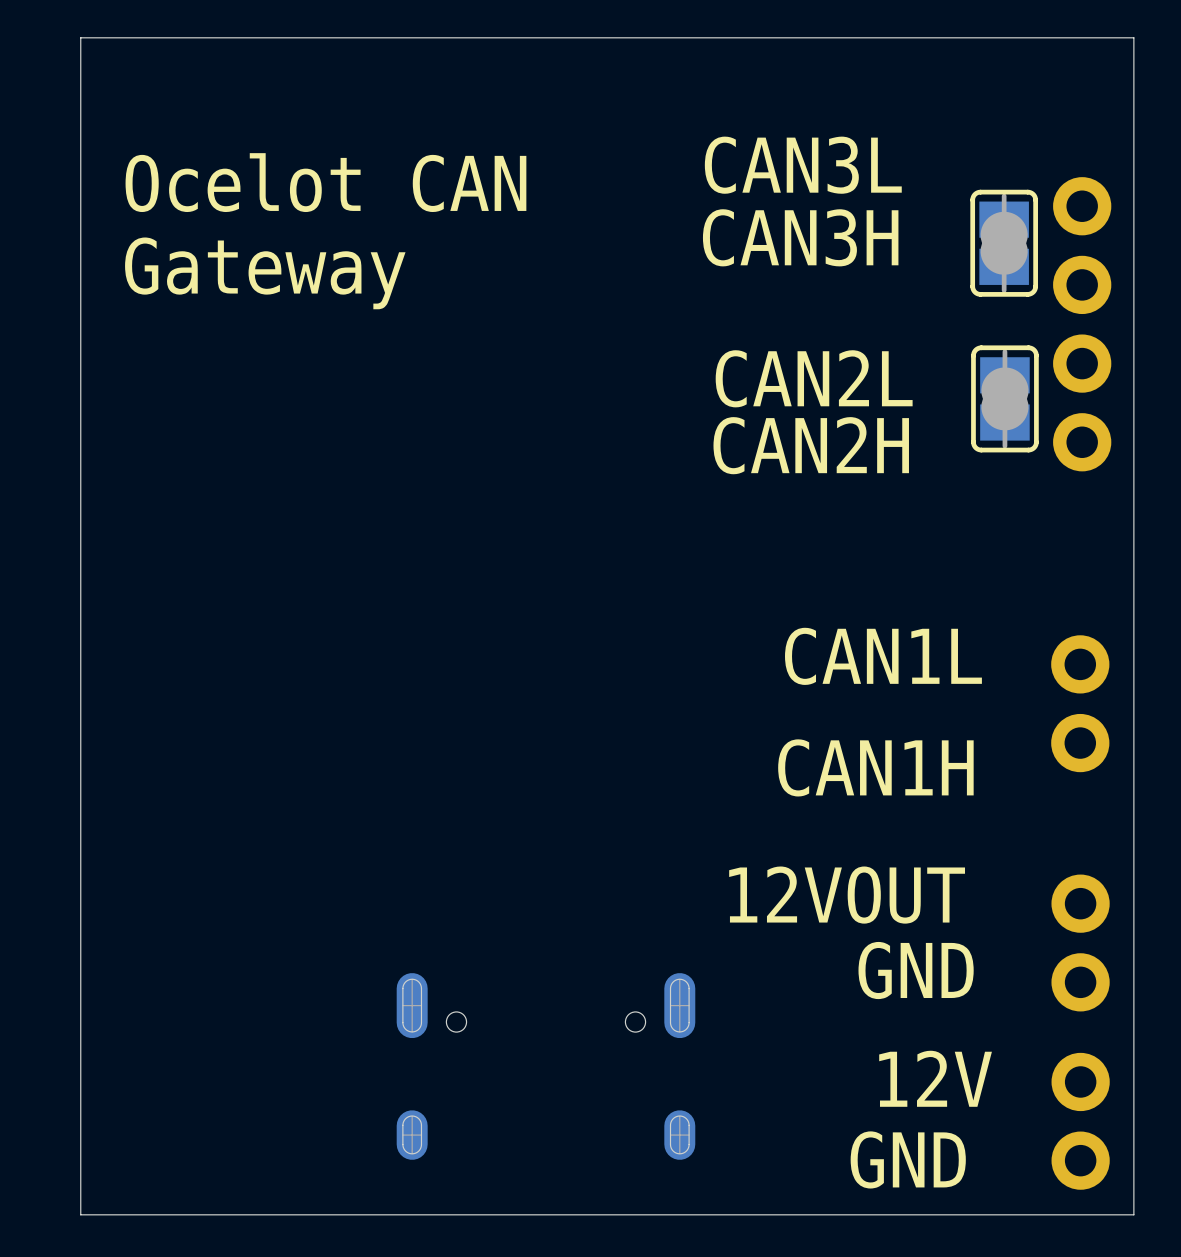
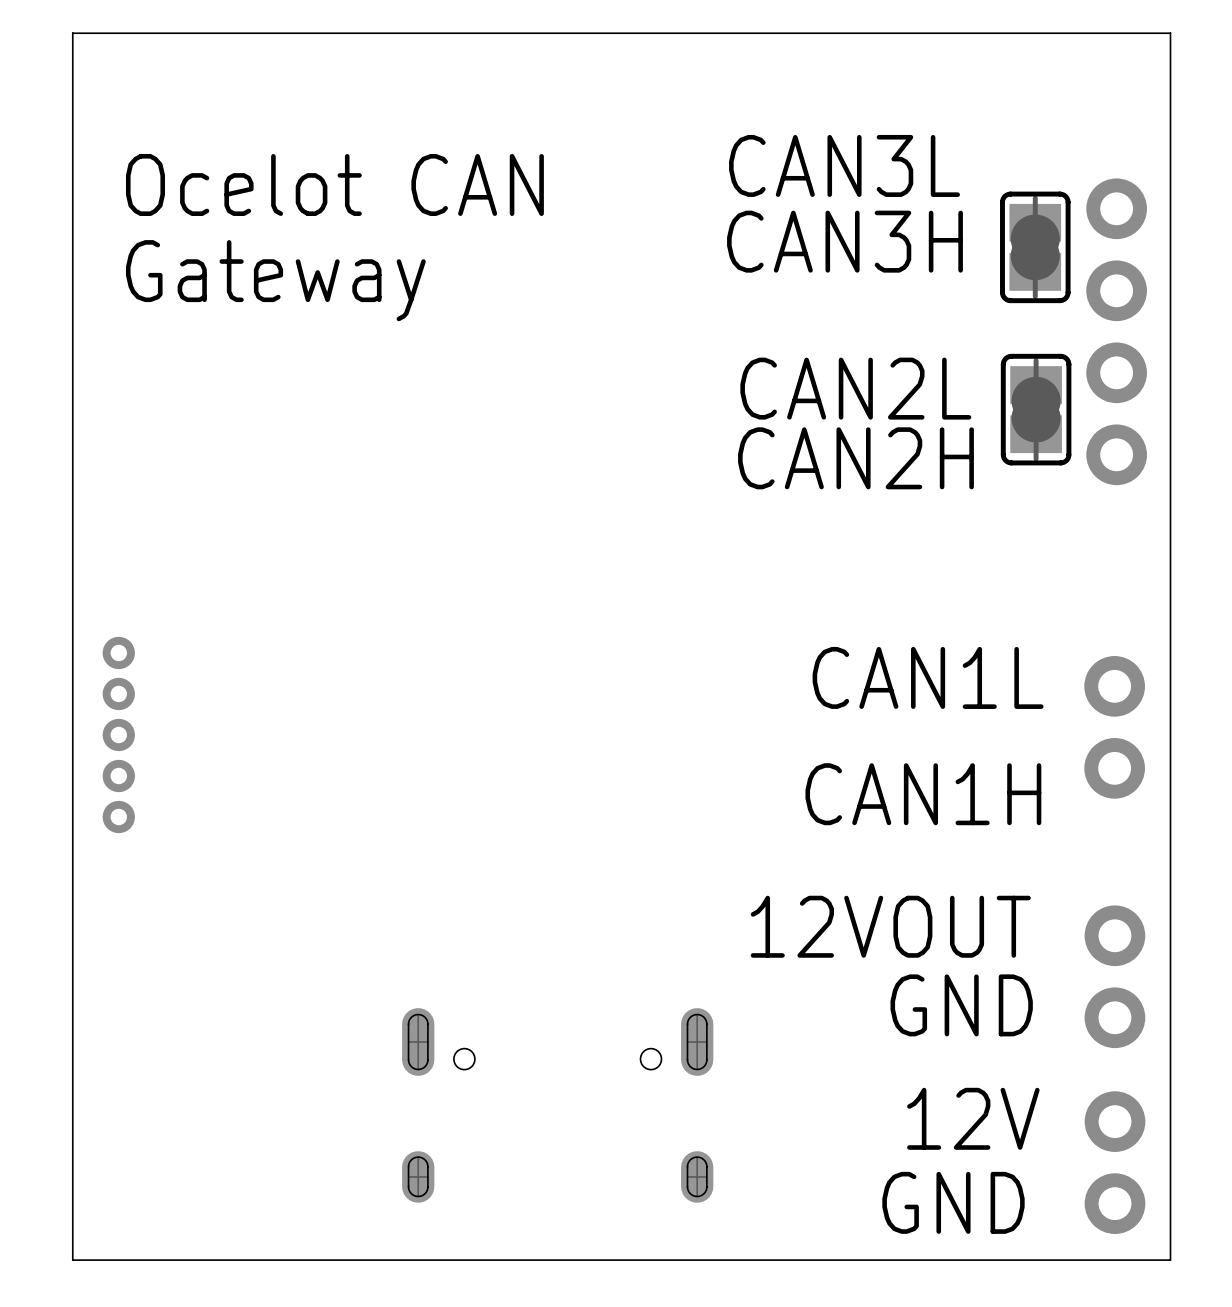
part: none -> (118, 734)

